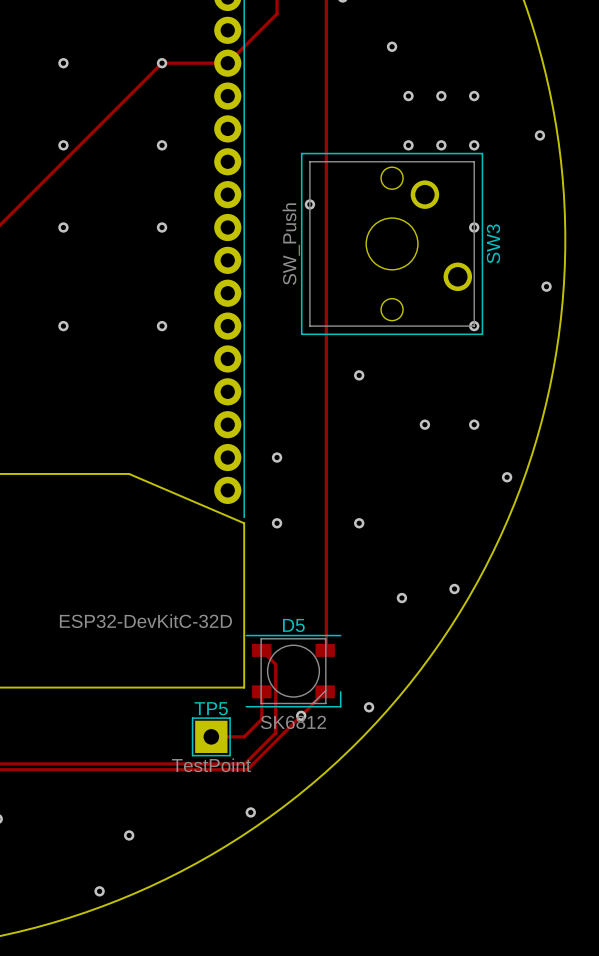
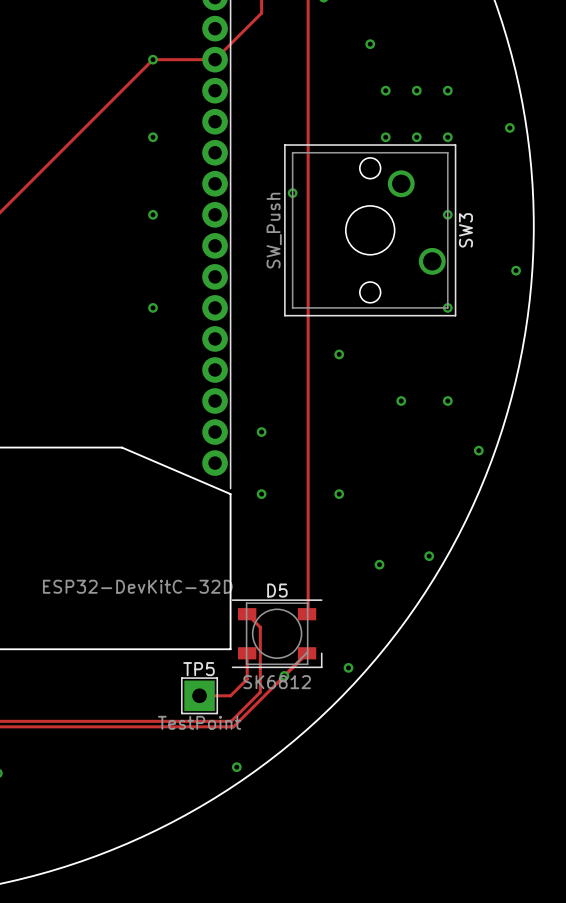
via: (63, 63) -> none
via: (63, 145) -> none
via: (63, 227) -> none
via: (63, 326) -> none
via: (129, 835) -> none
via: (99, 891) -> none

